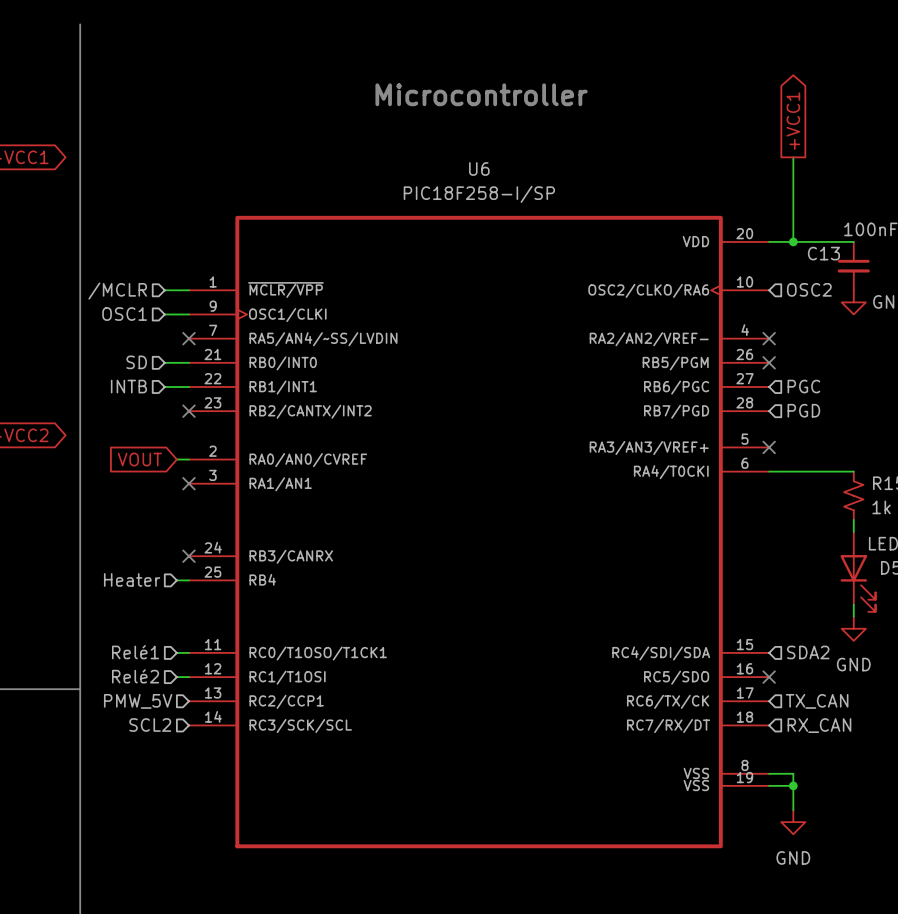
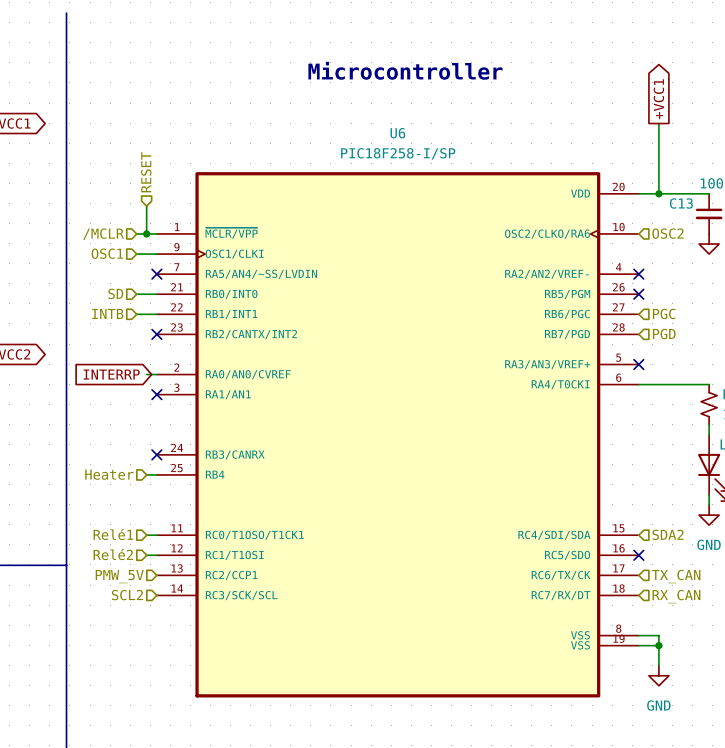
hierarchical label: none -> RESET (146, 172)
wire: none -> (146, 206) (146, 233)
junction: none -> (146, 233)
global label: VOUT (139, 459) -> INTERRP (111, 374)

